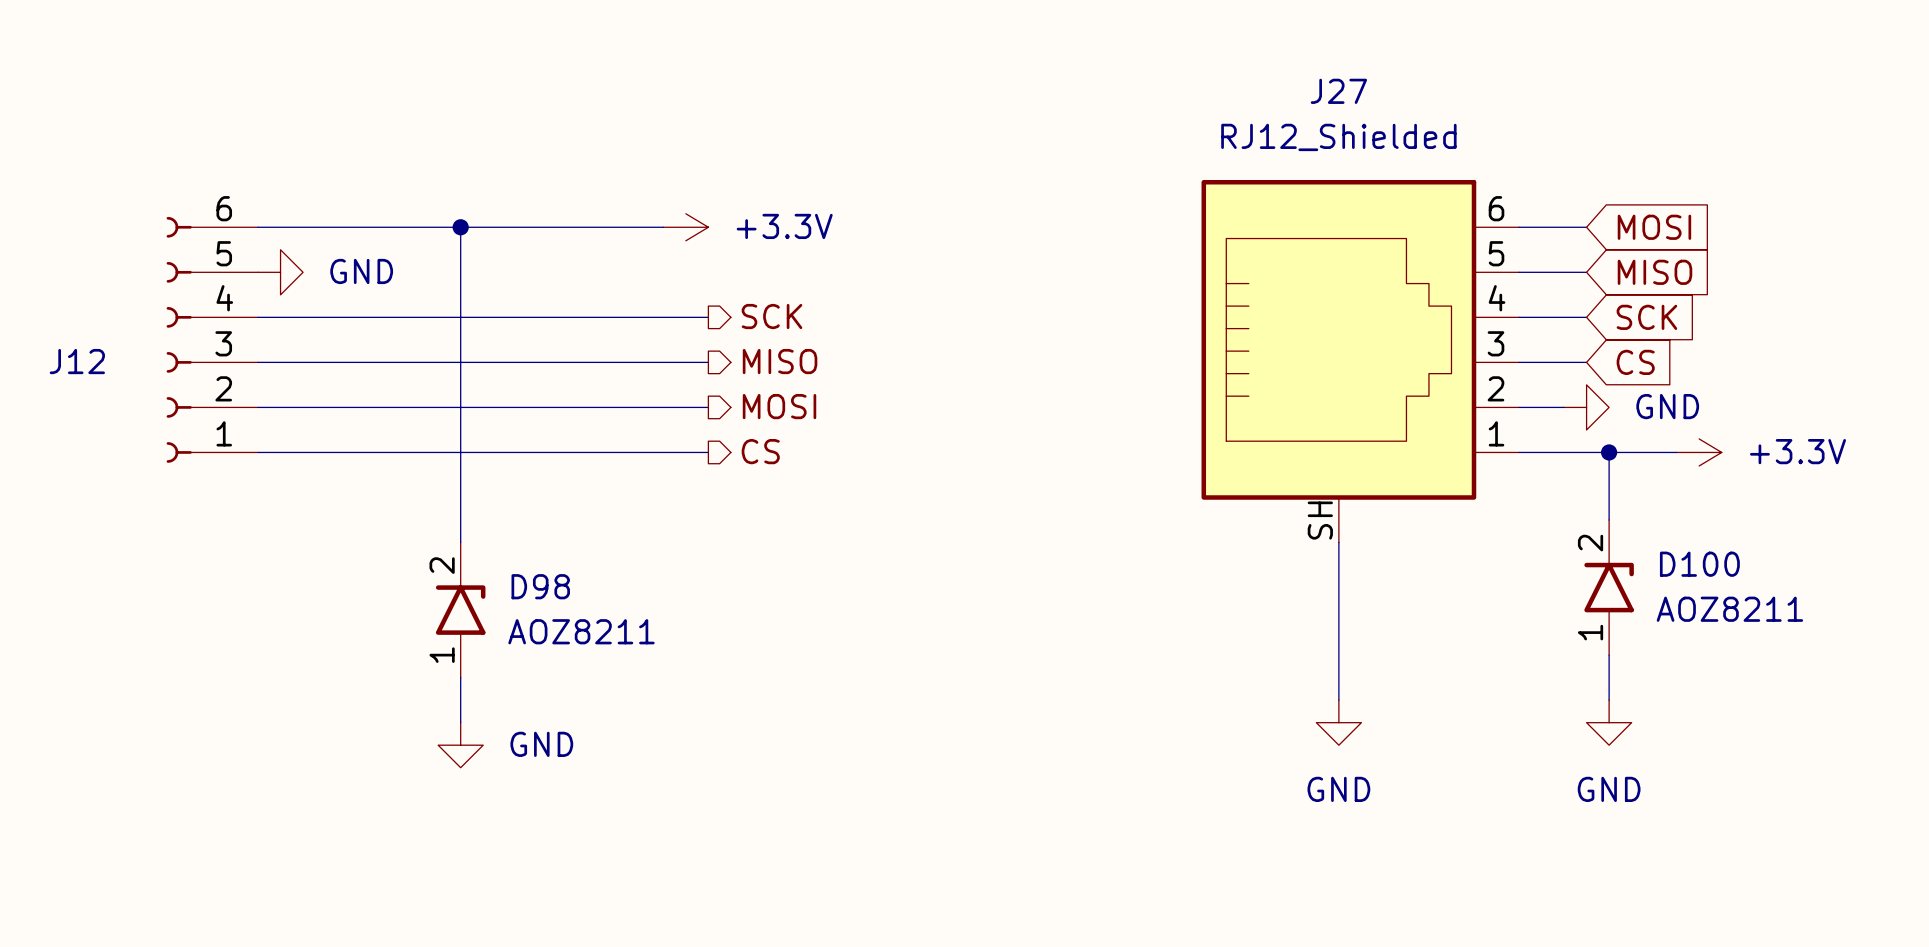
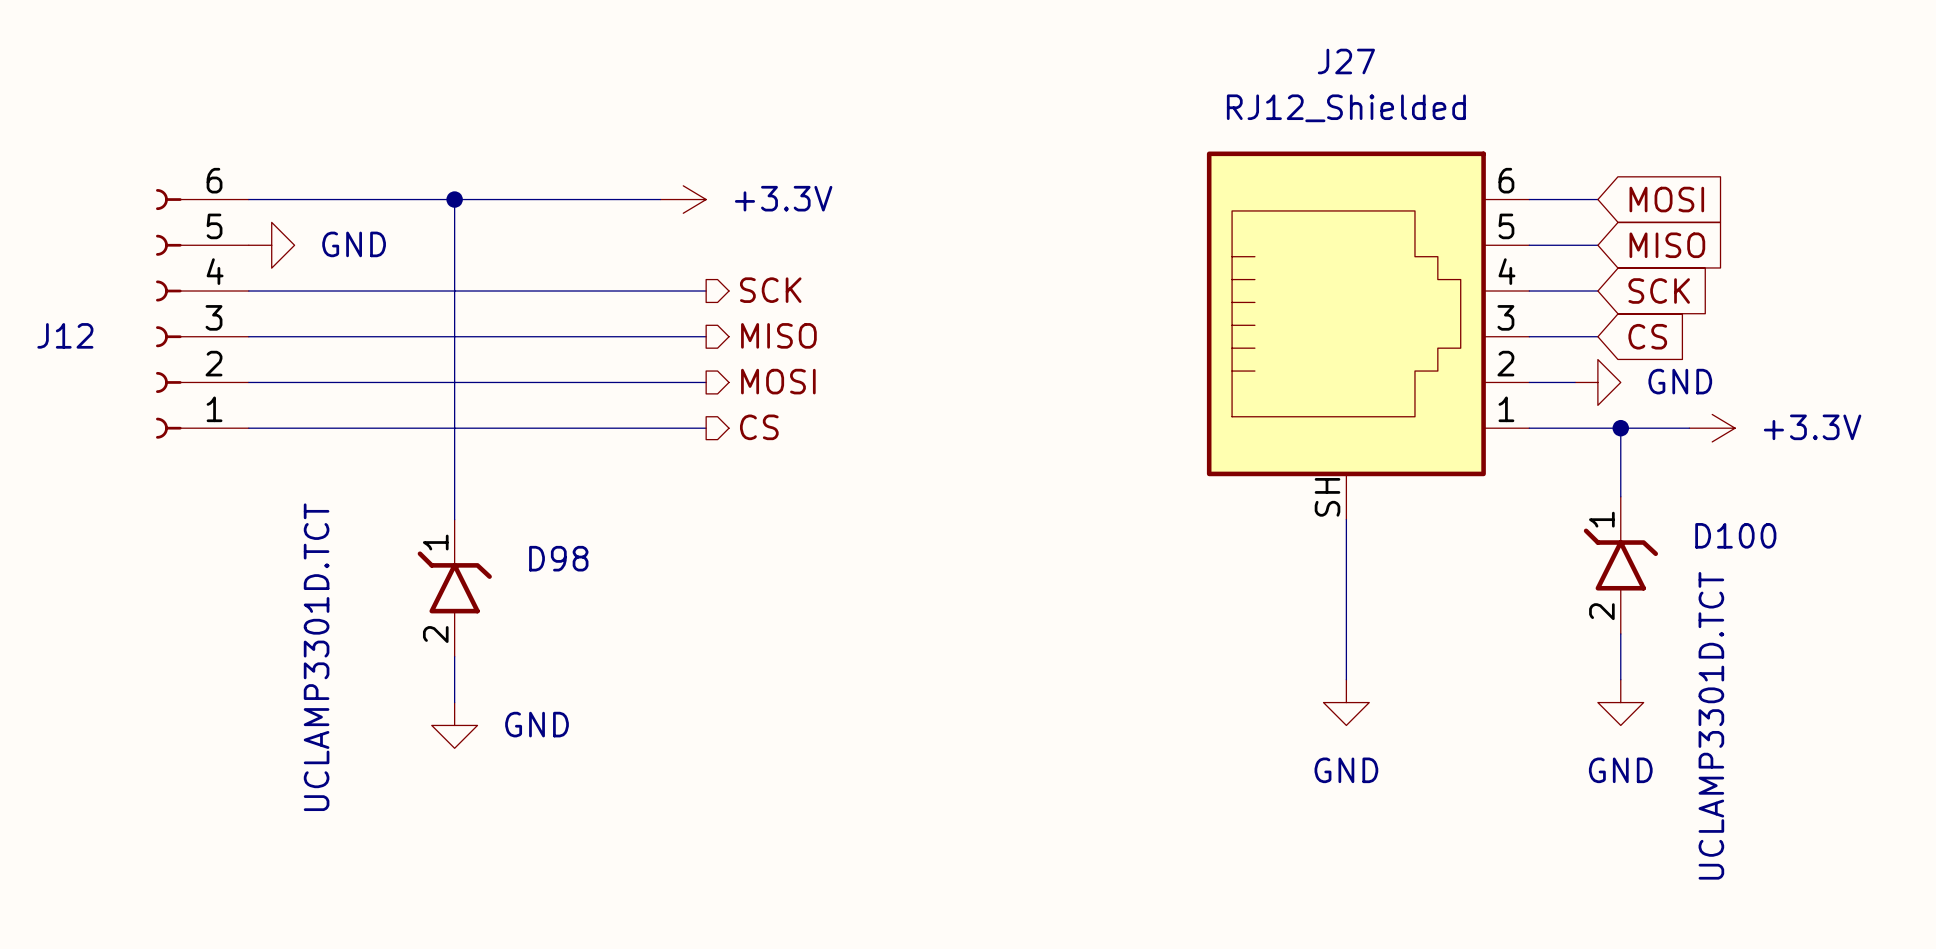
D100 symbol: [1584, 520, 1634, 656] -> [1583, 496, 1659, 634]
D98 symbol: [435, 542, 486, 678] -> [417, 519, 492, 657]
D100 value: AOZ8211 (1729, 609) -> UCLAMP3301D.TCT (1711, 725)
D98 value: AOZ8211 (581, 631) -> UCLAMP3301D.TCT (316, 657)

